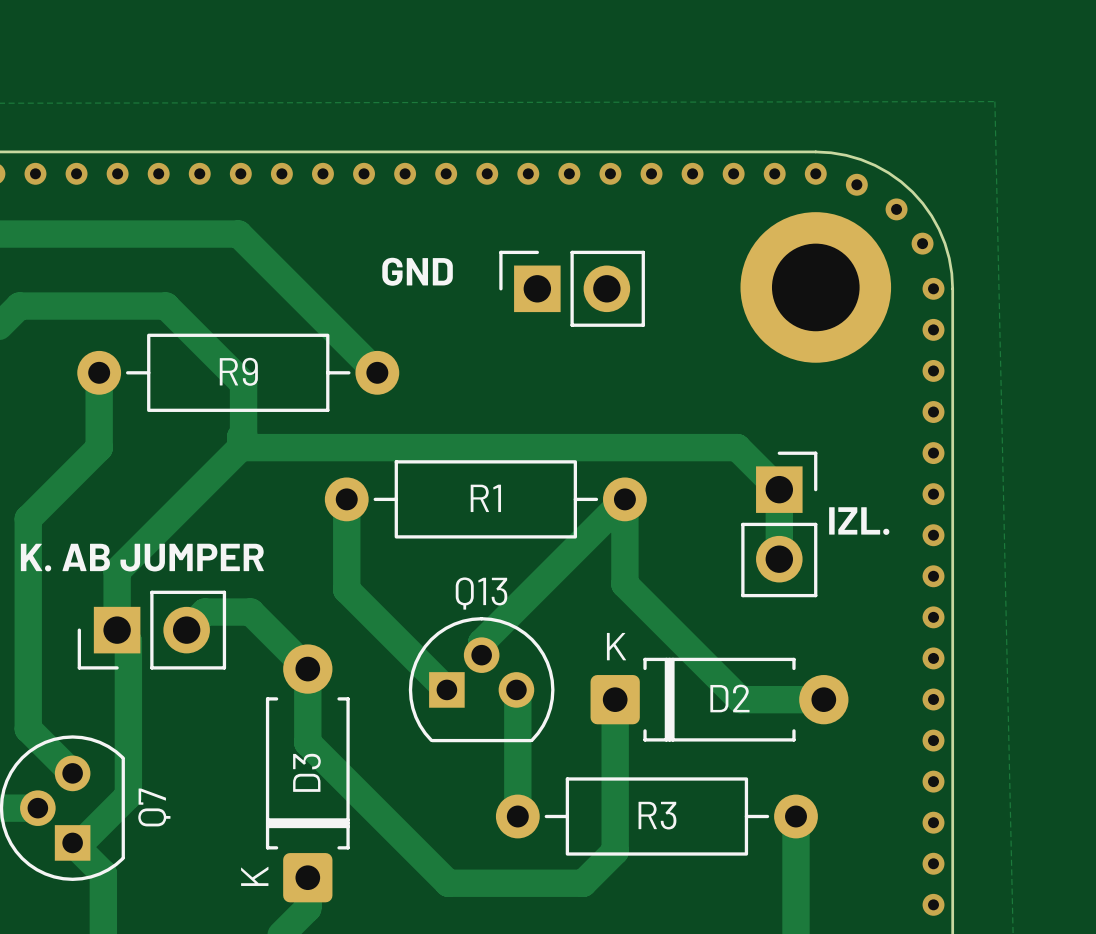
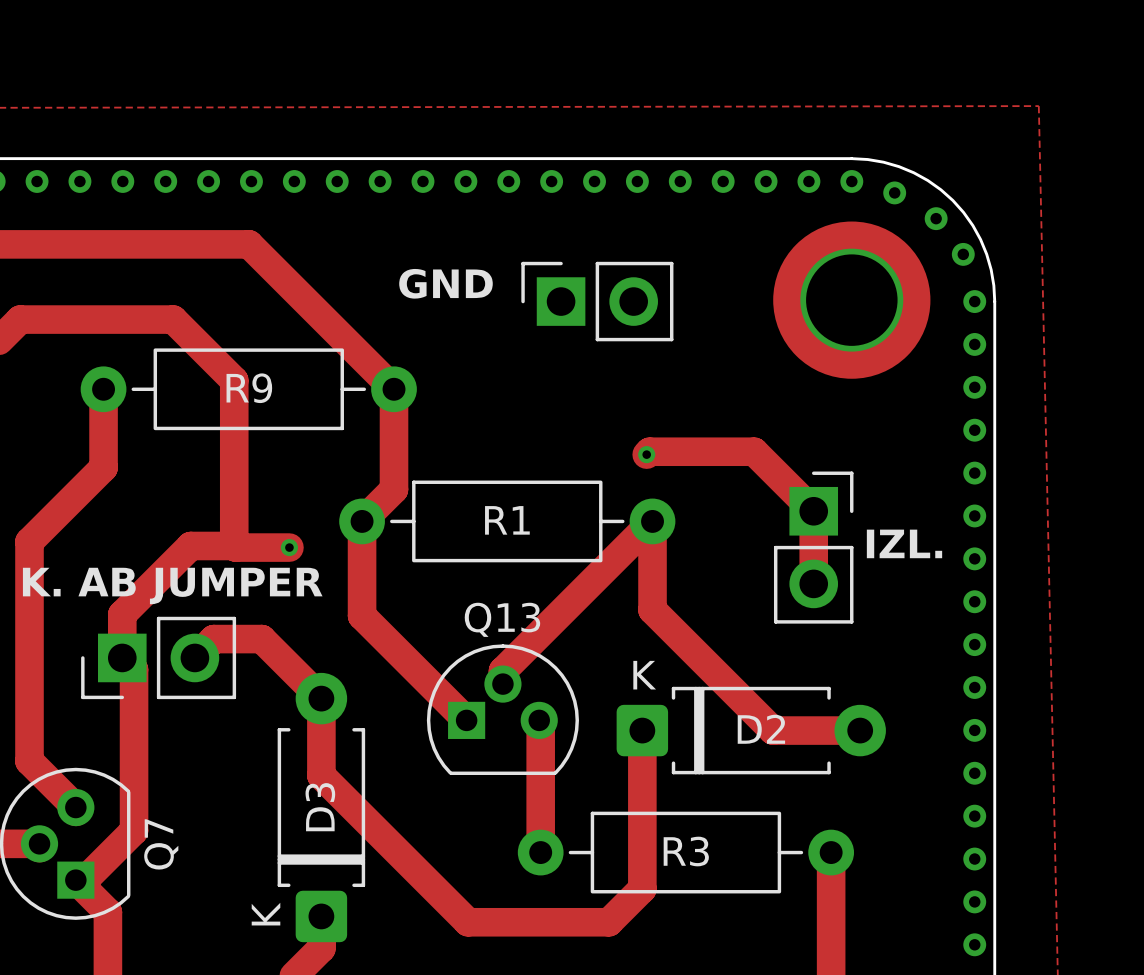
track: (224, 364) (243, 383) (243, 433) (240, 436) (240, 447) -> (234, 380) (234, 545)
track: none -> (394, 389) (394, 489) (362, 521)
via: none -> (646, 454)
track: (240, 447) (117, 571) (117, 588) -> (234, 545) (190, 545) (122, 614)
track: (240, 447) (737, 447) -> (646, 454) (649, 451) (754, 451) (769, 467)
track: none -> (234, 545) (235, 547) (289, 547)
via: none -> (289, 547)

